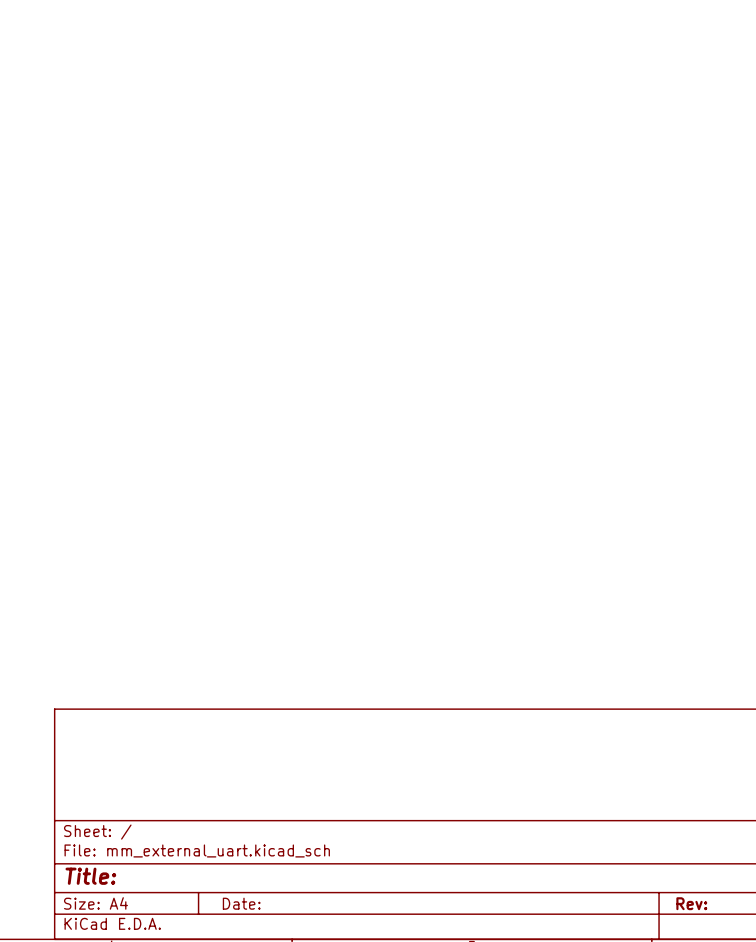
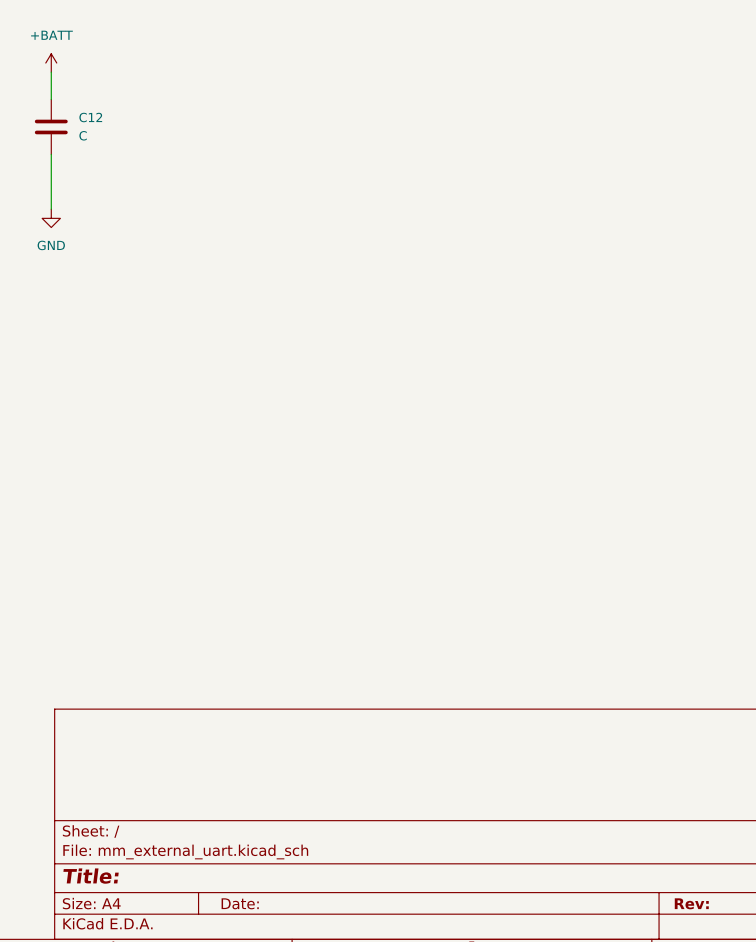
power symbol: none -> +BATT (51, 63)
wire: none -> (51, 72) (51, 99)
C12: none -> C (51, 126)
wire: none -> (51, 154) (51, 209)
power symbol: none -> GND (51, 218)

